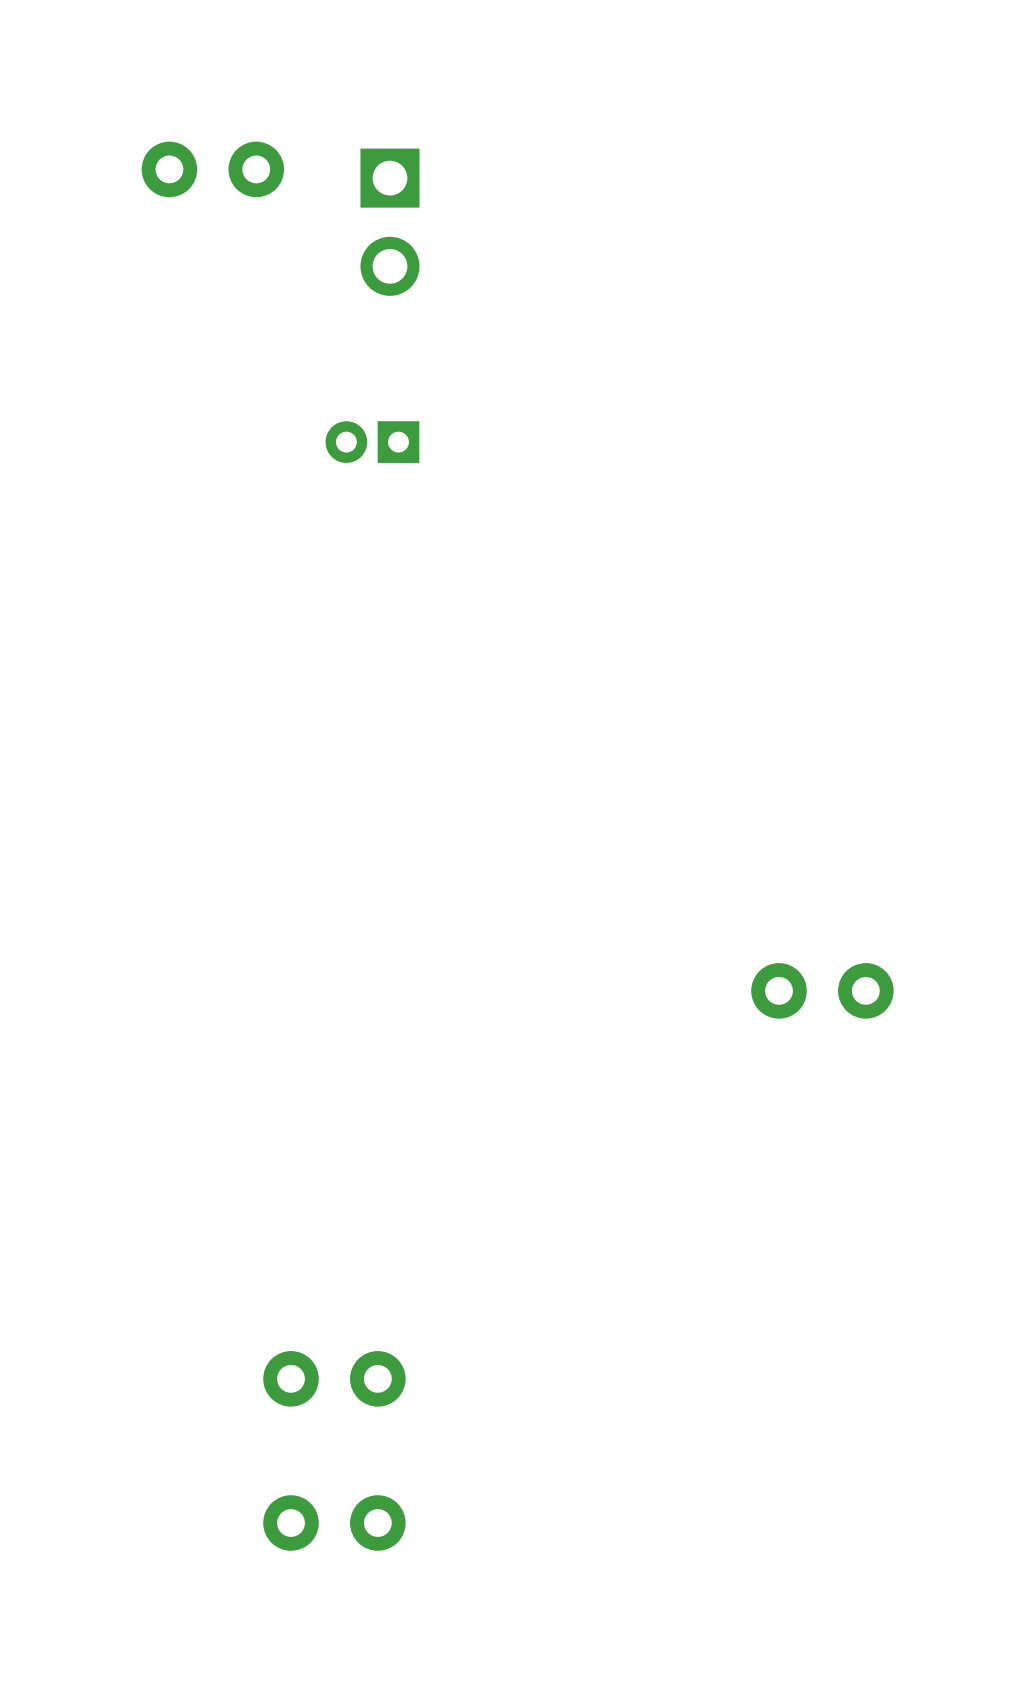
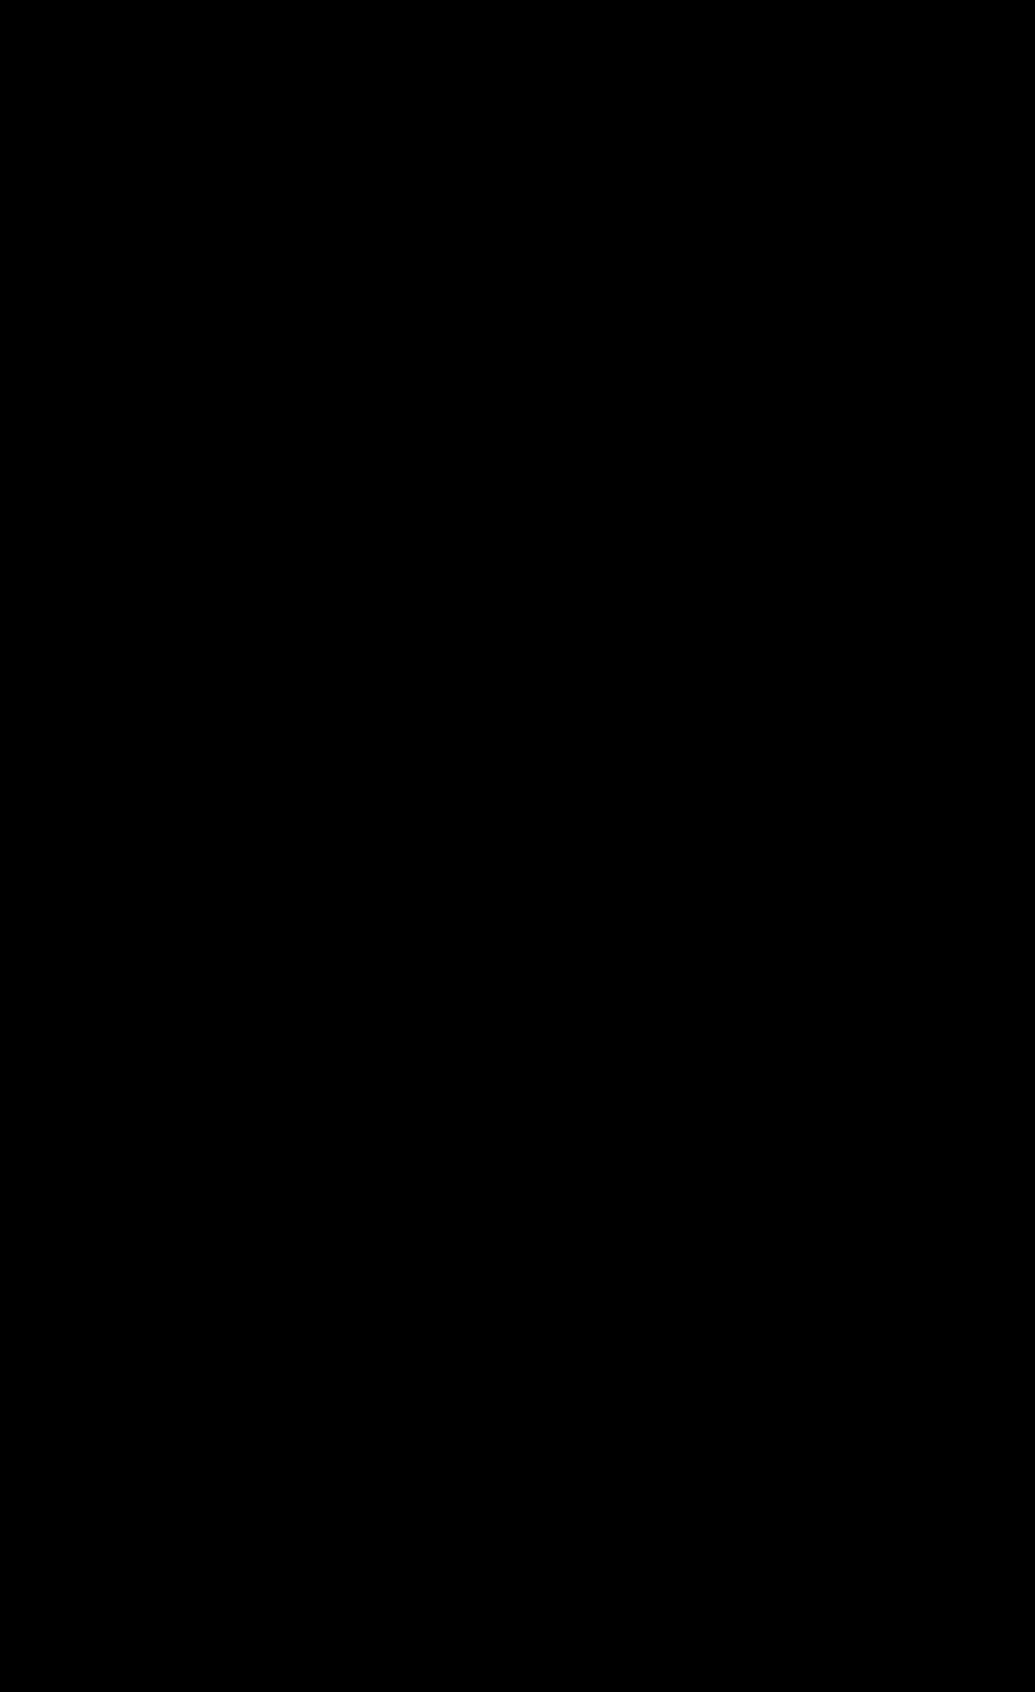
part: (212, 169) -> none
part: (389, 222) -> none
part: (372, 442) -> none
part: (822, 990) -> none
part: (334, 1378) -> none
part: (334, 1522) -> none

